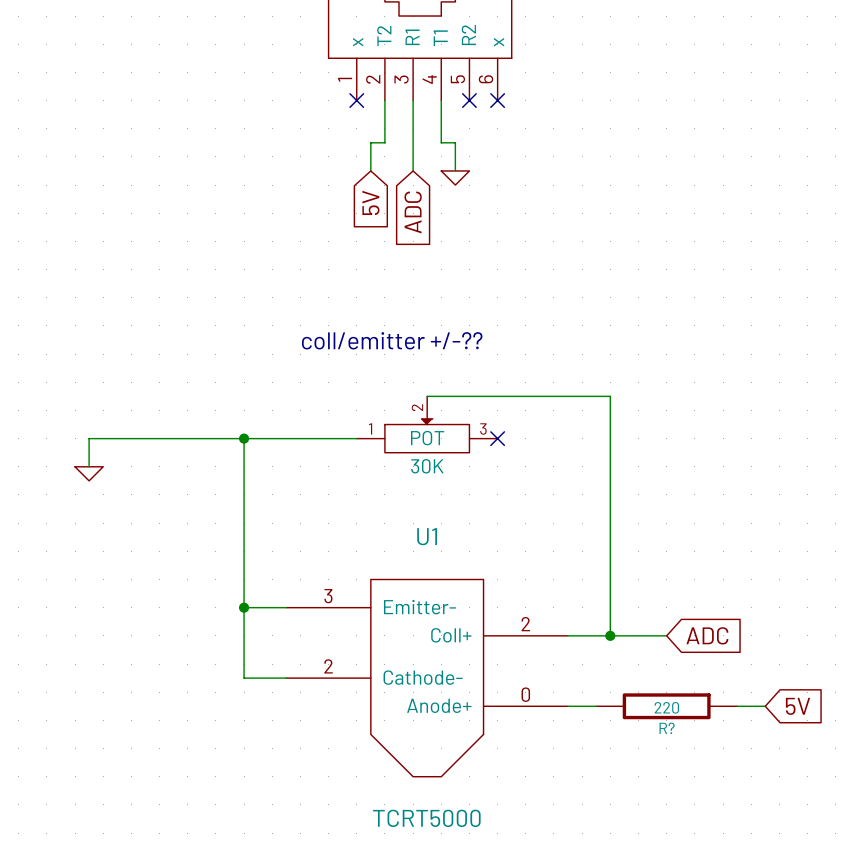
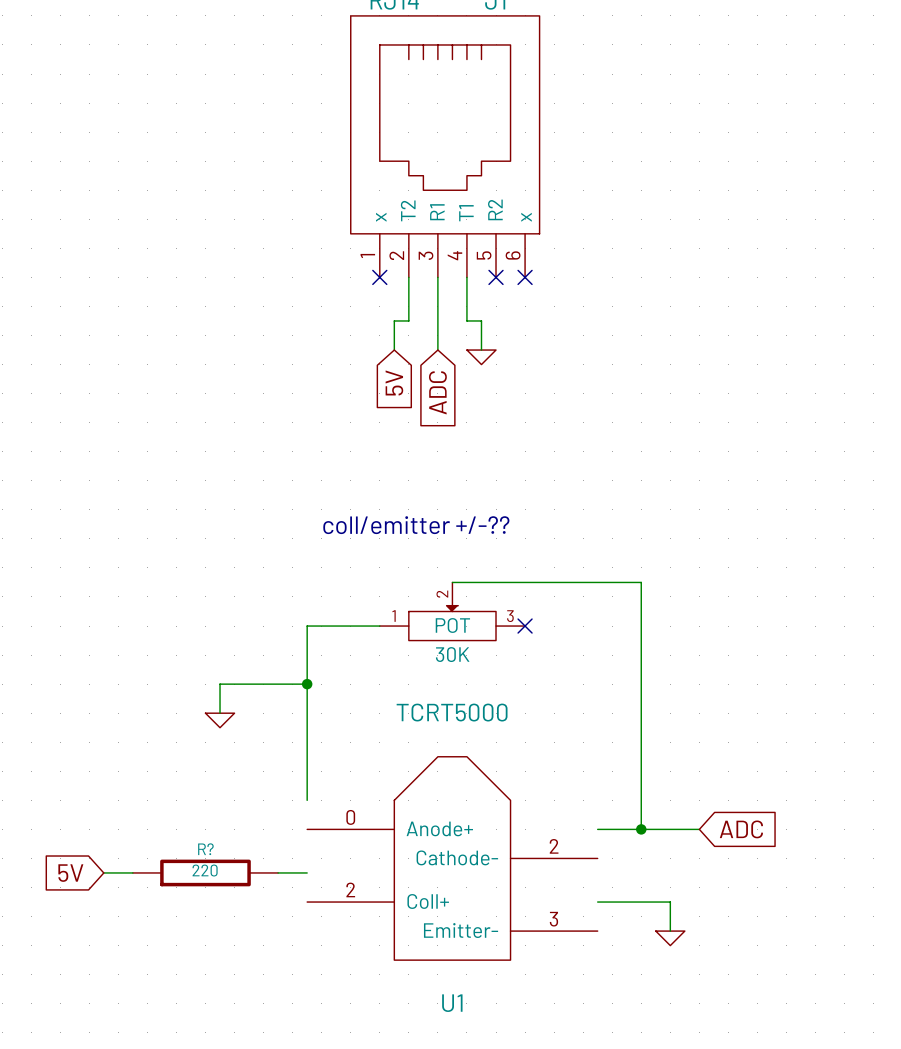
wire: (244, 438) (244, 678) (258, 678) -> none
junction: (244, 438) -> none
wire: (286, 438) (89, 438) (89, 466) -> none
power symbol position: (89, 473) -> (220, 720)
wire: none -> (307, 684) (220, 684) (220, 713)
junction: none -> (307, 684)
wire: (244, 607) (286, 607) -> (307, 626) (307, 800)
junction: (244, 607) -> none
global label: none -> 5V (70, 873)
wire: none -> (103, 872) (132, 872)
R?: none -> 220 (205, 872)
U1 rotation: 0° (427, 678) -> 180° (452, 858)
wire: none -> (626, 902) (670, 902) (670, 931)
R?: 220 (666, 706) -> none
wire: (737, 706) (765, 706) -> none
global label: 5V (798, 706) -> none
power symbol: none -> (670, 938)

